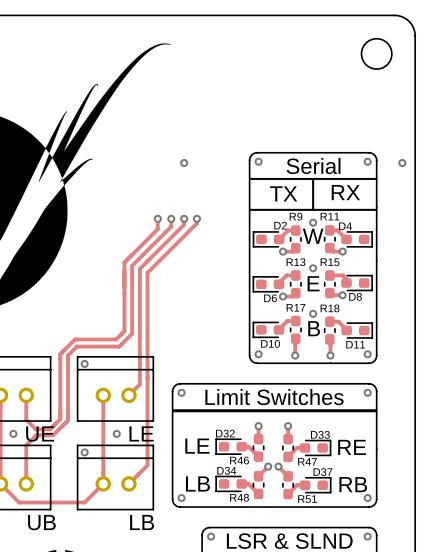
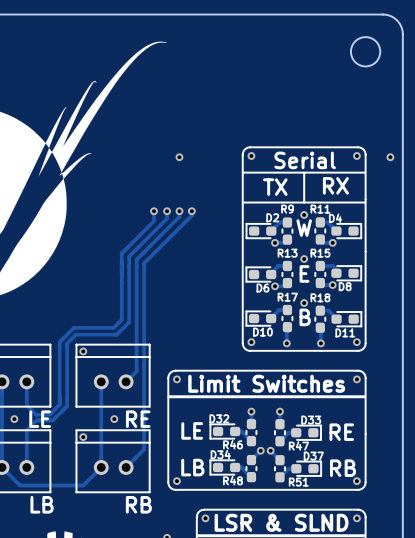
text: LE (141, 433) -> RE (138, 419)
text: UE (40, 434) -> LE (40, 419)
text: UB (41, 522) -> LB (42, 504)
text: LB (142, 522) -> RB (138, 504)

